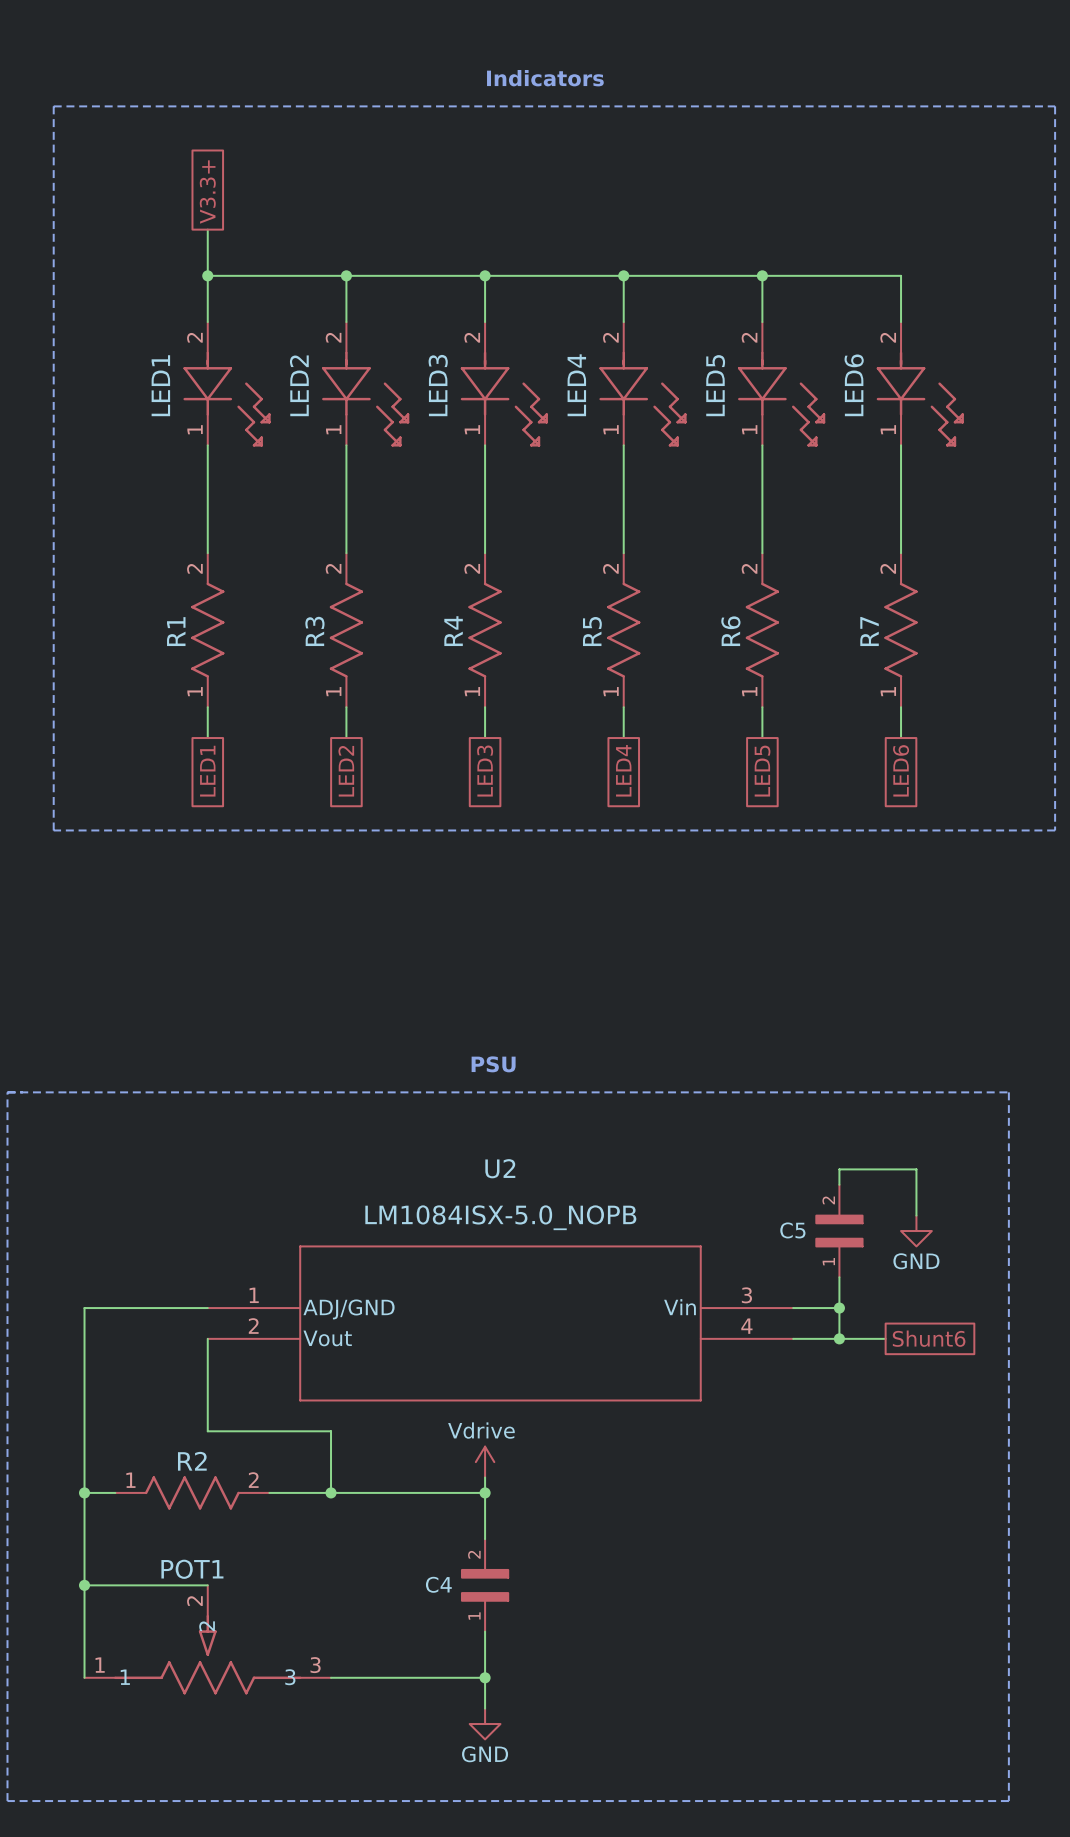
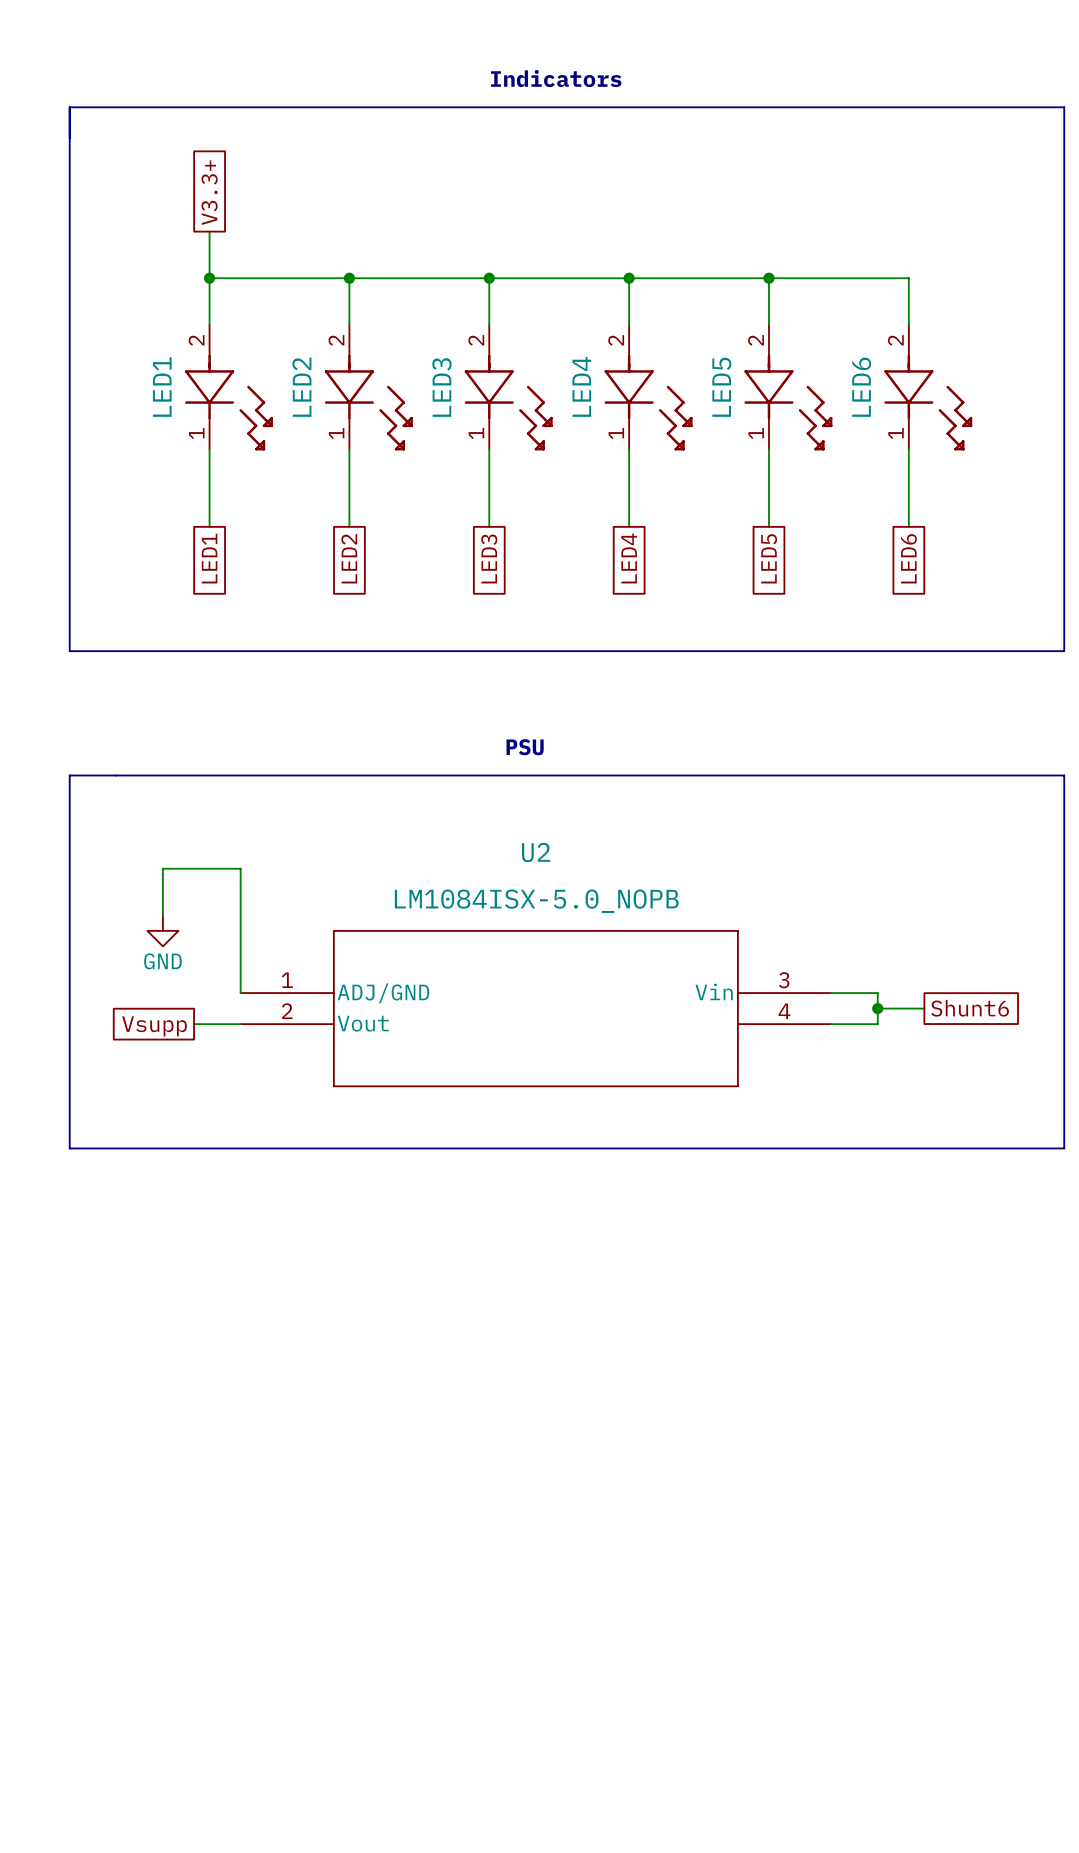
line: (53, 106) (53, 830) (1055, 830) (1055, 106) (53, 106) -> (69, 107) (69, 651) (1064, 651) (1064, 107) (69, 107)
wire: (207, 522) (207, 553) -> none
wire: (346, 522) (346, 553) -> none
wire: (485, 522) (485, 553) -> none
wire: (623, 522) (623, 553) -> none
wire: (762, 522) (762, 553) -> none
wire: (901, 522) (901, 553) -> none
R1: (207, 630) -> none
R3: (346, 630) -> none
R4: (485, 630) -> none
R5: (623, 630) -> none
R6: (762, 630) -> none
R7: (901, 630) -> none
wire: (207, 707) (207, 738) -> none
wire: (346, 707) (346, 738) -> none
wire: (485, 707) (485, 738) -> none
wire: (623, 707) (623, 738) -> none
wire: (762, 707) (762, 738) -> none
wire: (901, 707) (901, 738) -> none
text: none -> PSU (525, 747)
line: none -> (69, 775) (69, 1148) (1064, 1148) (1064, 775) (69, 775)
global label position: LED4 (623, 770) -> LED4 (629, 558)
global label position: LED6 (901, 770) -> LED6 (908, 558)
global label position: LED1 (207, 771) -> LED1 (209, 558)
global label position: LED2 (346, 771) -> LED2 (349, 558)
global label position: LED3 (485, 771) -> LED3 (489, 558)
global label position: LED5 (762, 771) -> LED5 (769, 558)
wire: none -> (162, 915) (162, 868) (240, 868) (240, 993)
power symbol: none -> GND (162, 930)
wire: none -> (831, 993) (877, 993) (877, 1024) (831, 1024)
wire: none -> (877, 1008) (924, 1008)
junction: none -> (877, 1008)
global label: none -> Shunt6 (970, 1008)
wire: none -> (194, 1024) (240, 1024)
global label: none -> Vsupp (154, 1026)
text: PSU (493, 1064) -> none
line: (7, 1092) (1008, 1092) (1008, 1801) (7, 1801) (7, 1092) -> none
wire: (839, 1184) (839, 1169) (916, 1169) (916, 1215) -> none
C5: (839, 1231) -> none
power symbol: GND (916, 1231) -> none
wire: (839, 1277) (839, 1338) -> none
wire: (207, 1308) (84, 1308) (84, 1677) -> none
wire: (793, 1308) (839, 1308) -> none
junction: (839, 1308) -> none
U2 position: (500, 1323) -> (535, 1008)
wire: (207, 1338) (207, 1431) (331, 1431) (331, 1492) -> none
wire: (793, 1338) (885, 1338) -> none
junction: (839, 1338) -> none
global label: Shunt6 (929, 1338) -> none
power symbol: Vdrive (485, 1462) -> none
wire: (485, 1477) (485, 1539) -> none
wire: (84, 1492) (115, 1492) -> none
junction: (84, 1492) -> none
R2: (192, 1492) -> none
wire: (269, 1492) (485, 1492) -> none
junction: (331, 1492) -> none
junction: (485, 1492) -> none
wire: (84, 1585) (207, 1585) -> none
junction: (84, 1585) -> none
C4: (485, 1585) -> none
wire: (485, 1631) (485, 1708) -> none
POT1: (207, 1639) -> none
wire: (331, 1677) (485, 1677) -> none
junction: (485, 1677) -> none
power symbol: GND (485, 1724) -> none

